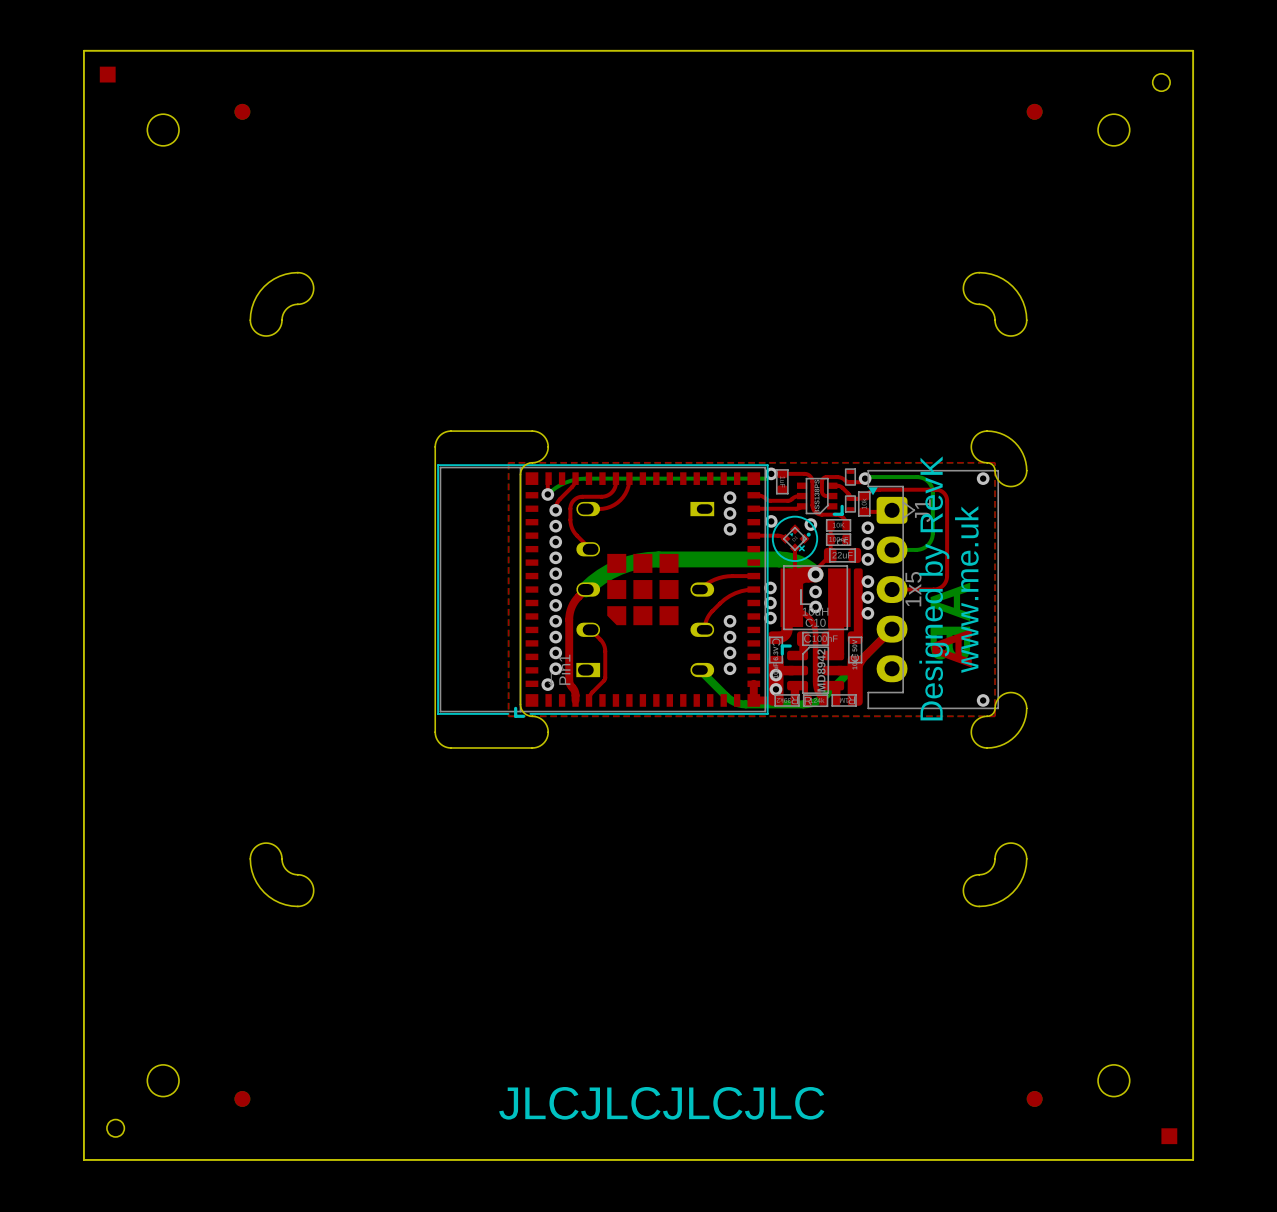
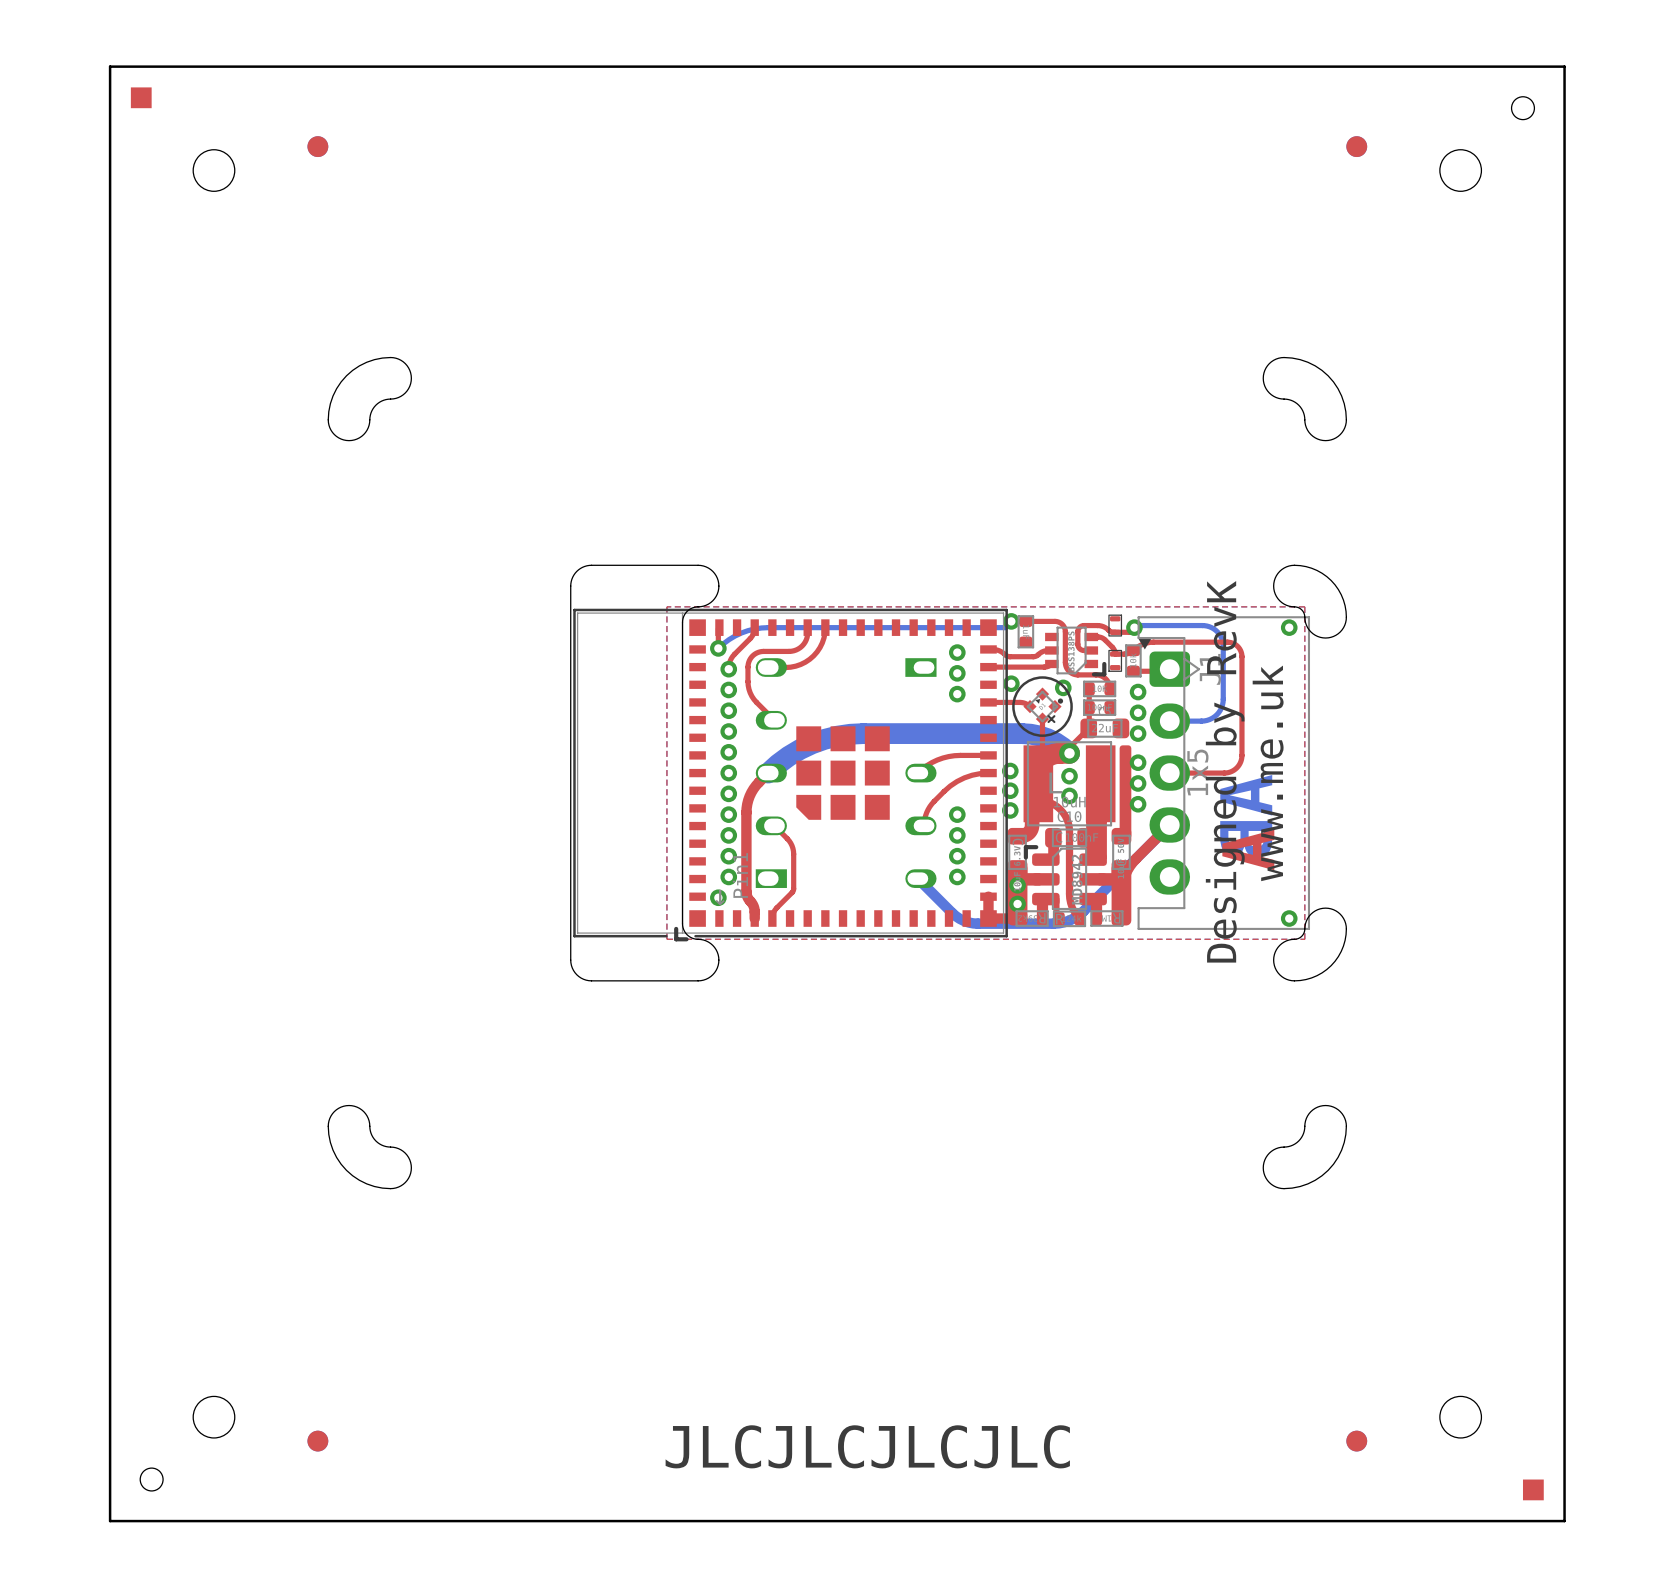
part footprint: [845, 468, 856, 486] -> [1108, 614, 1122, 637]
part footprint: [845, 495, 856, 513] -> [1108, 649, 1122, 672]

